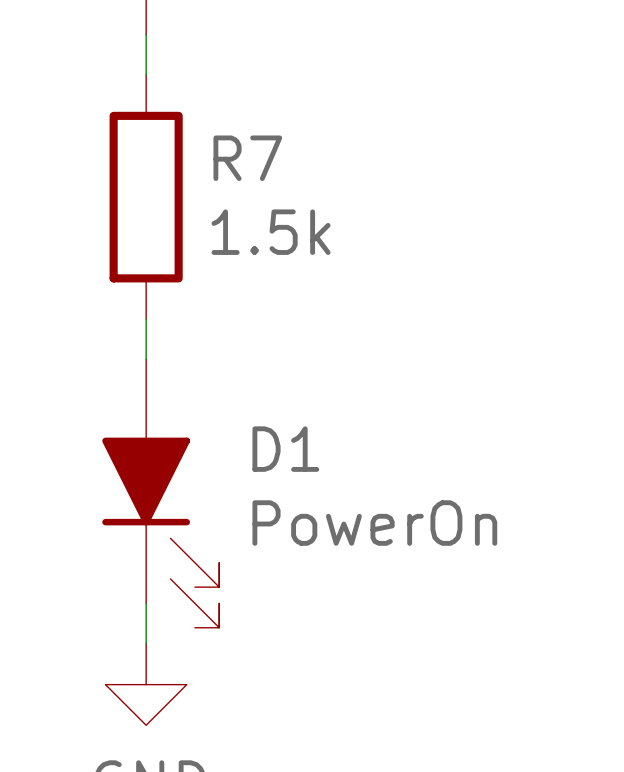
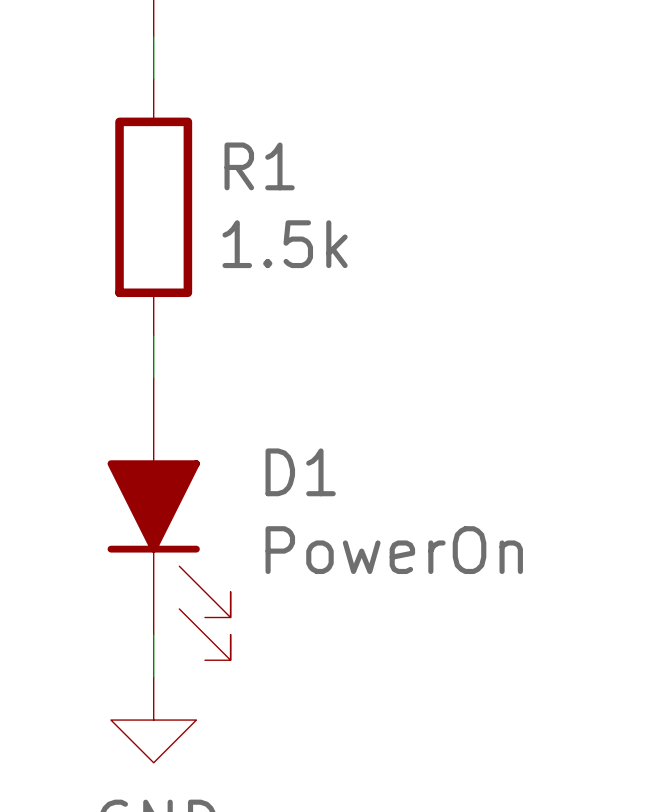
R7 name: R7 (247, 158) -> R1 (259, 166)

